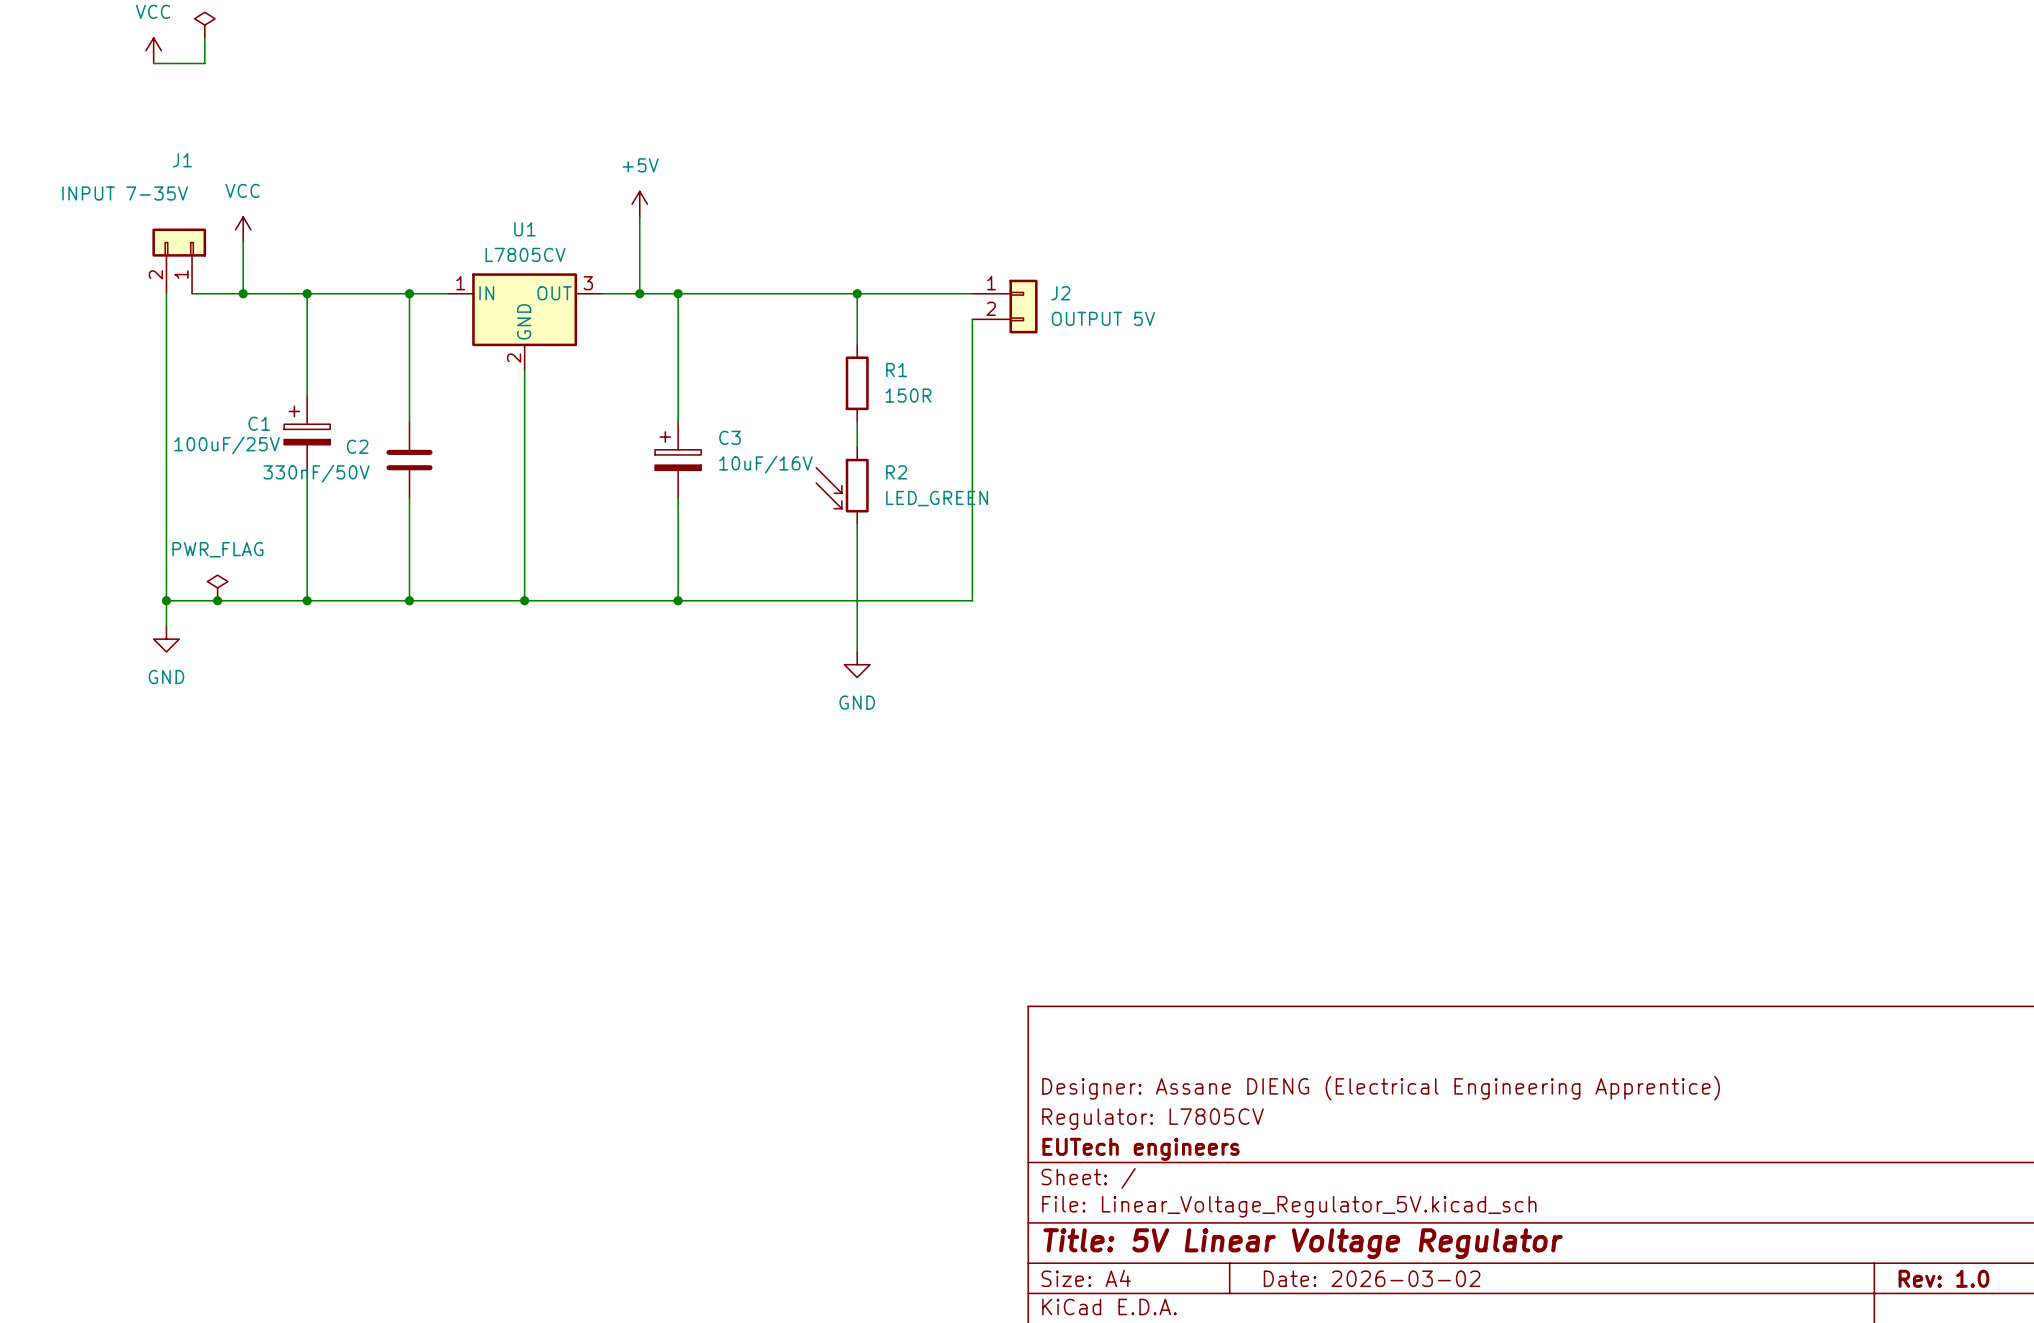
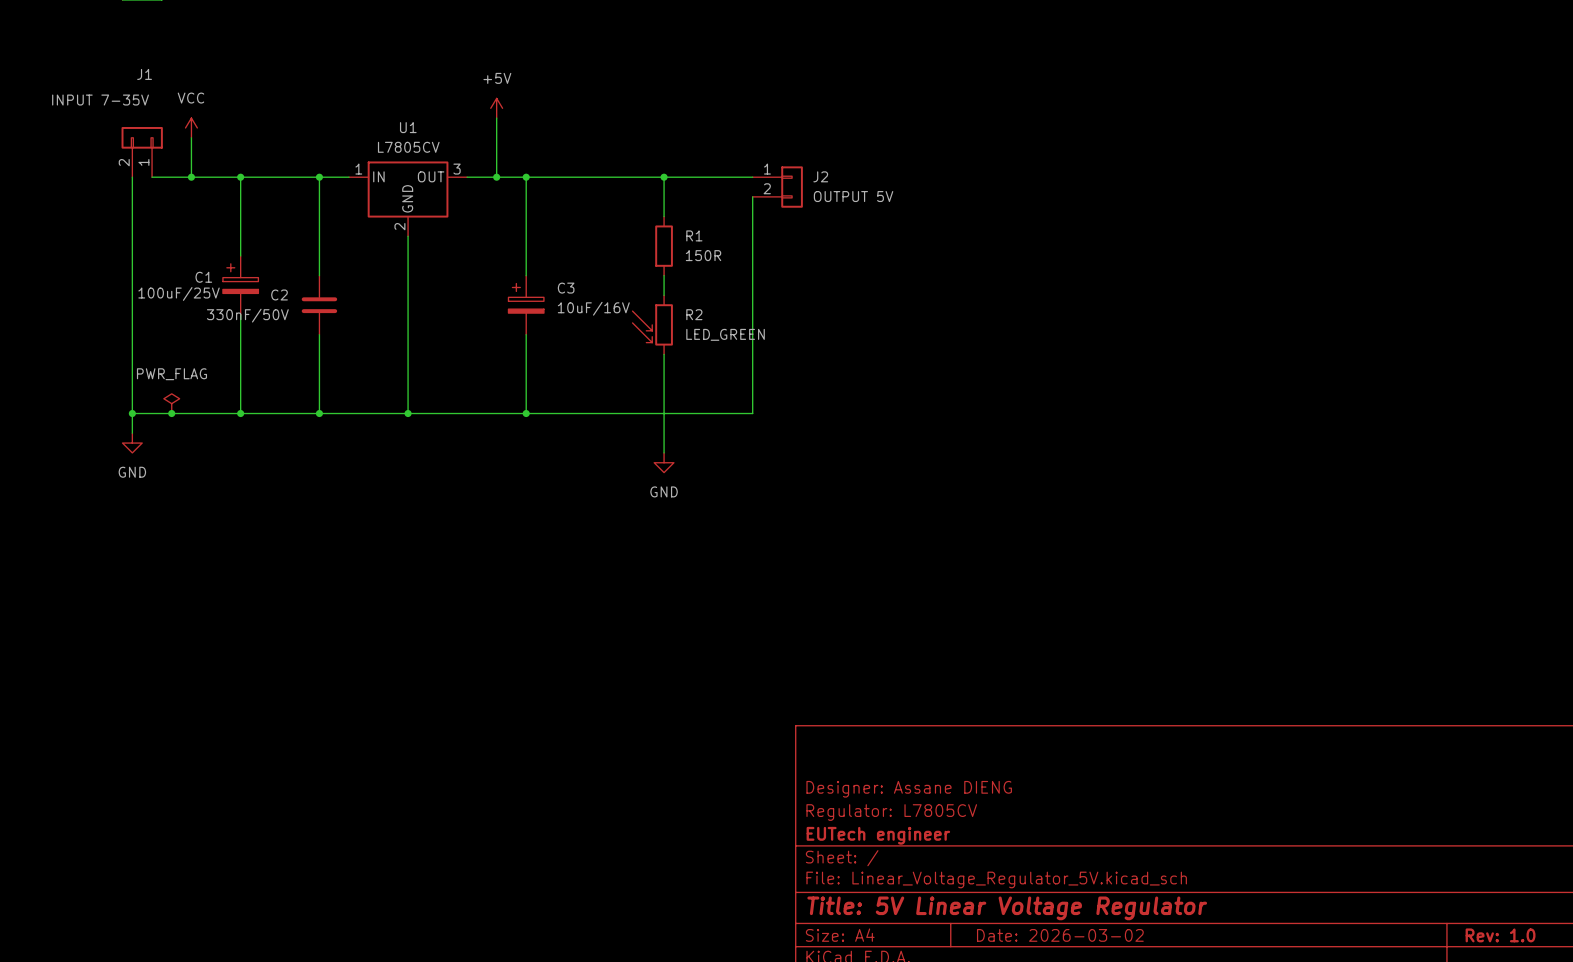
title block: Designer: Assane DIENG (Electrical Engineering Apprentice) (1381, 1088) -> Designer: Assane DIENG (909, 789)
title block: EUTech engineers (1141, 1149) -> EUTech engineer (878, 835)

